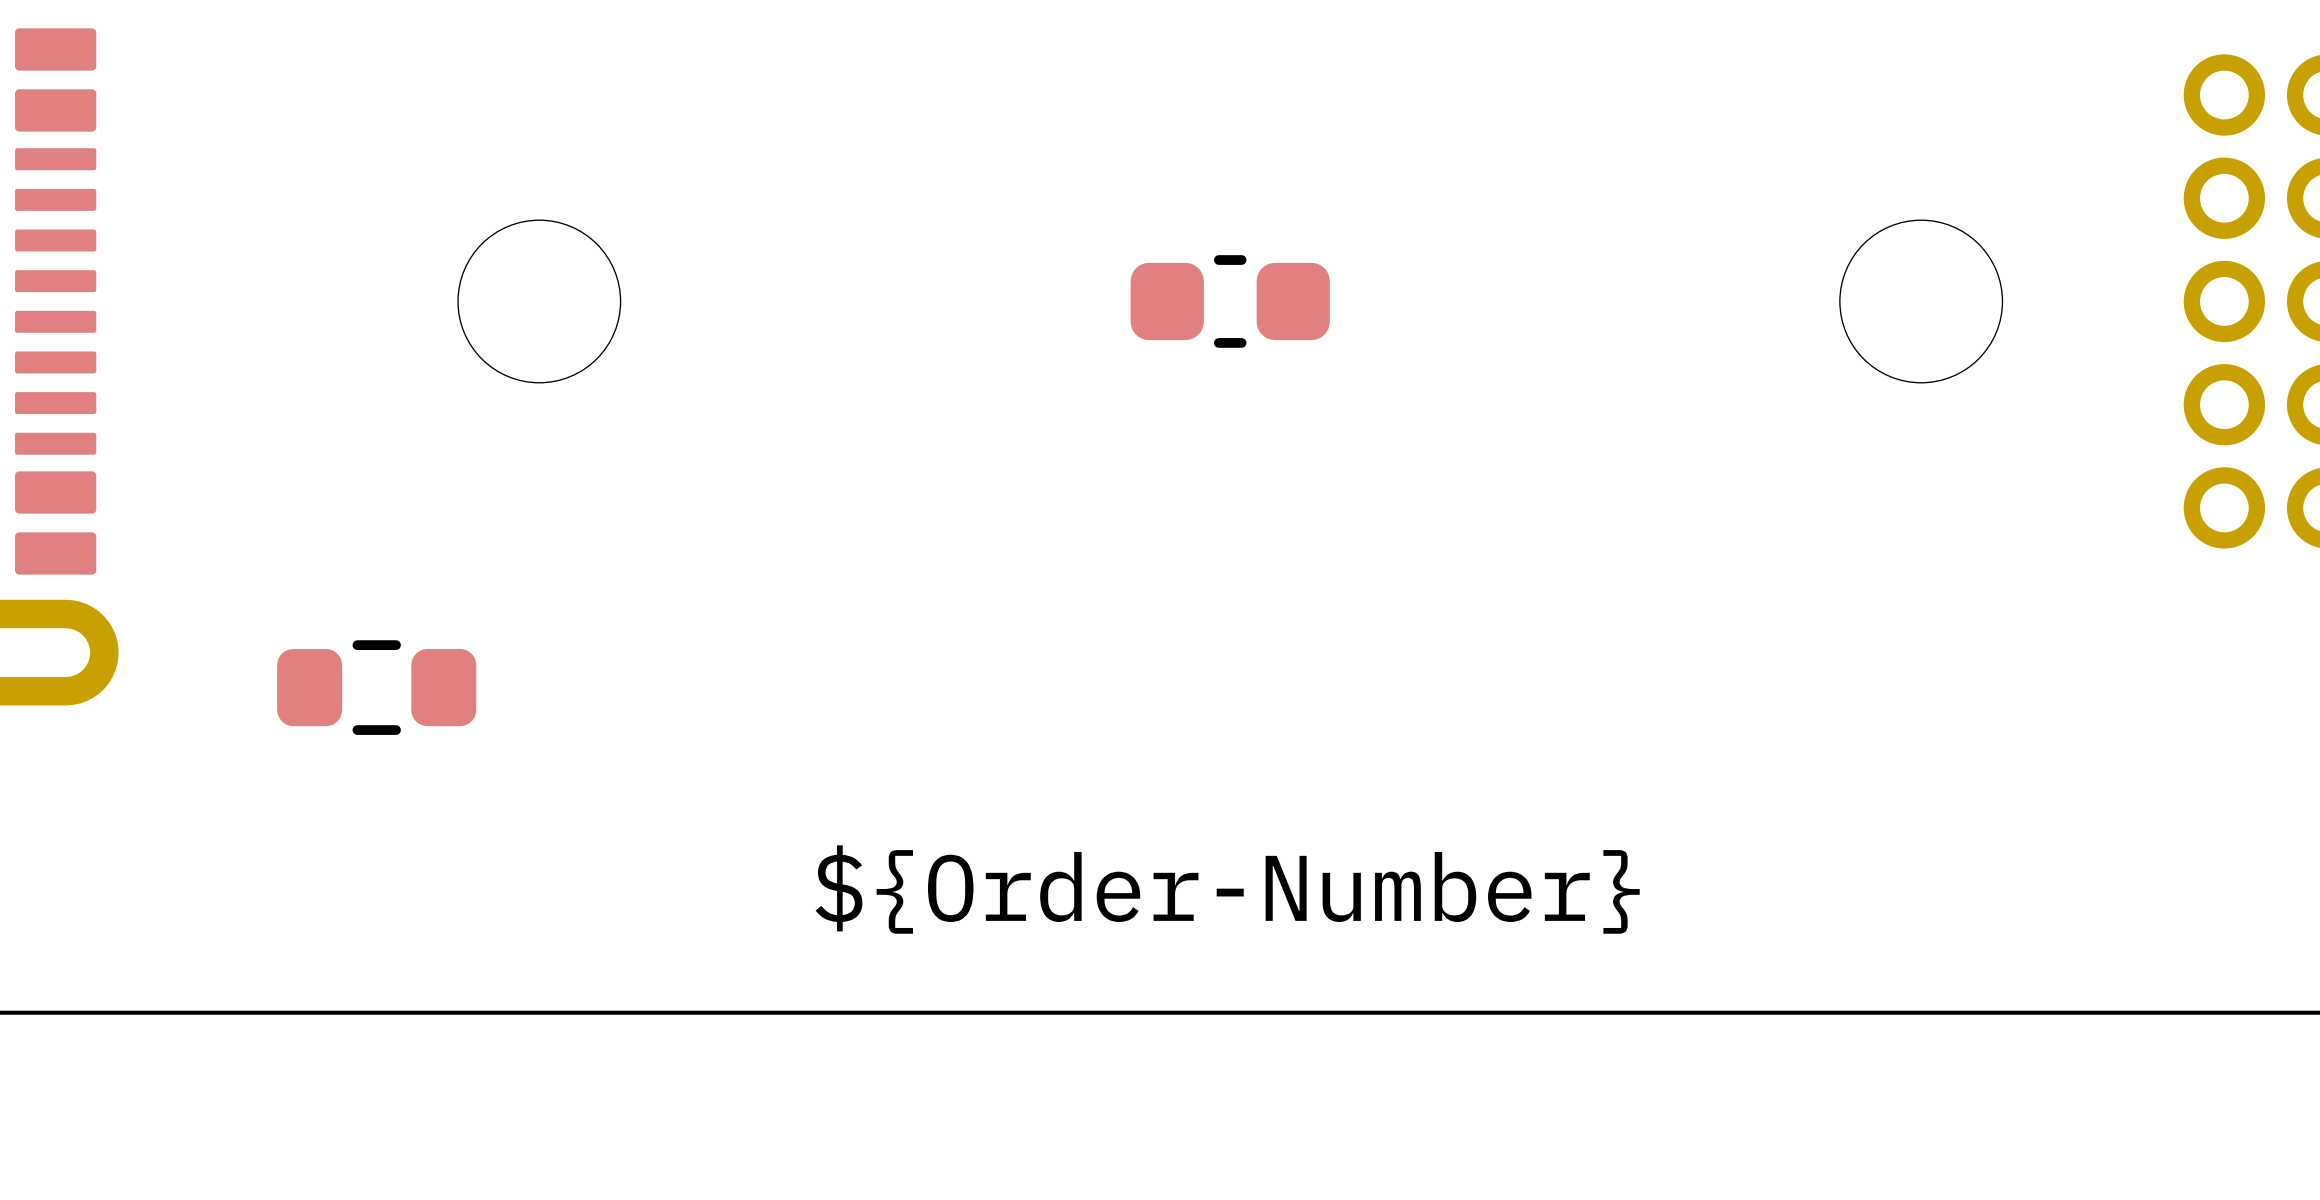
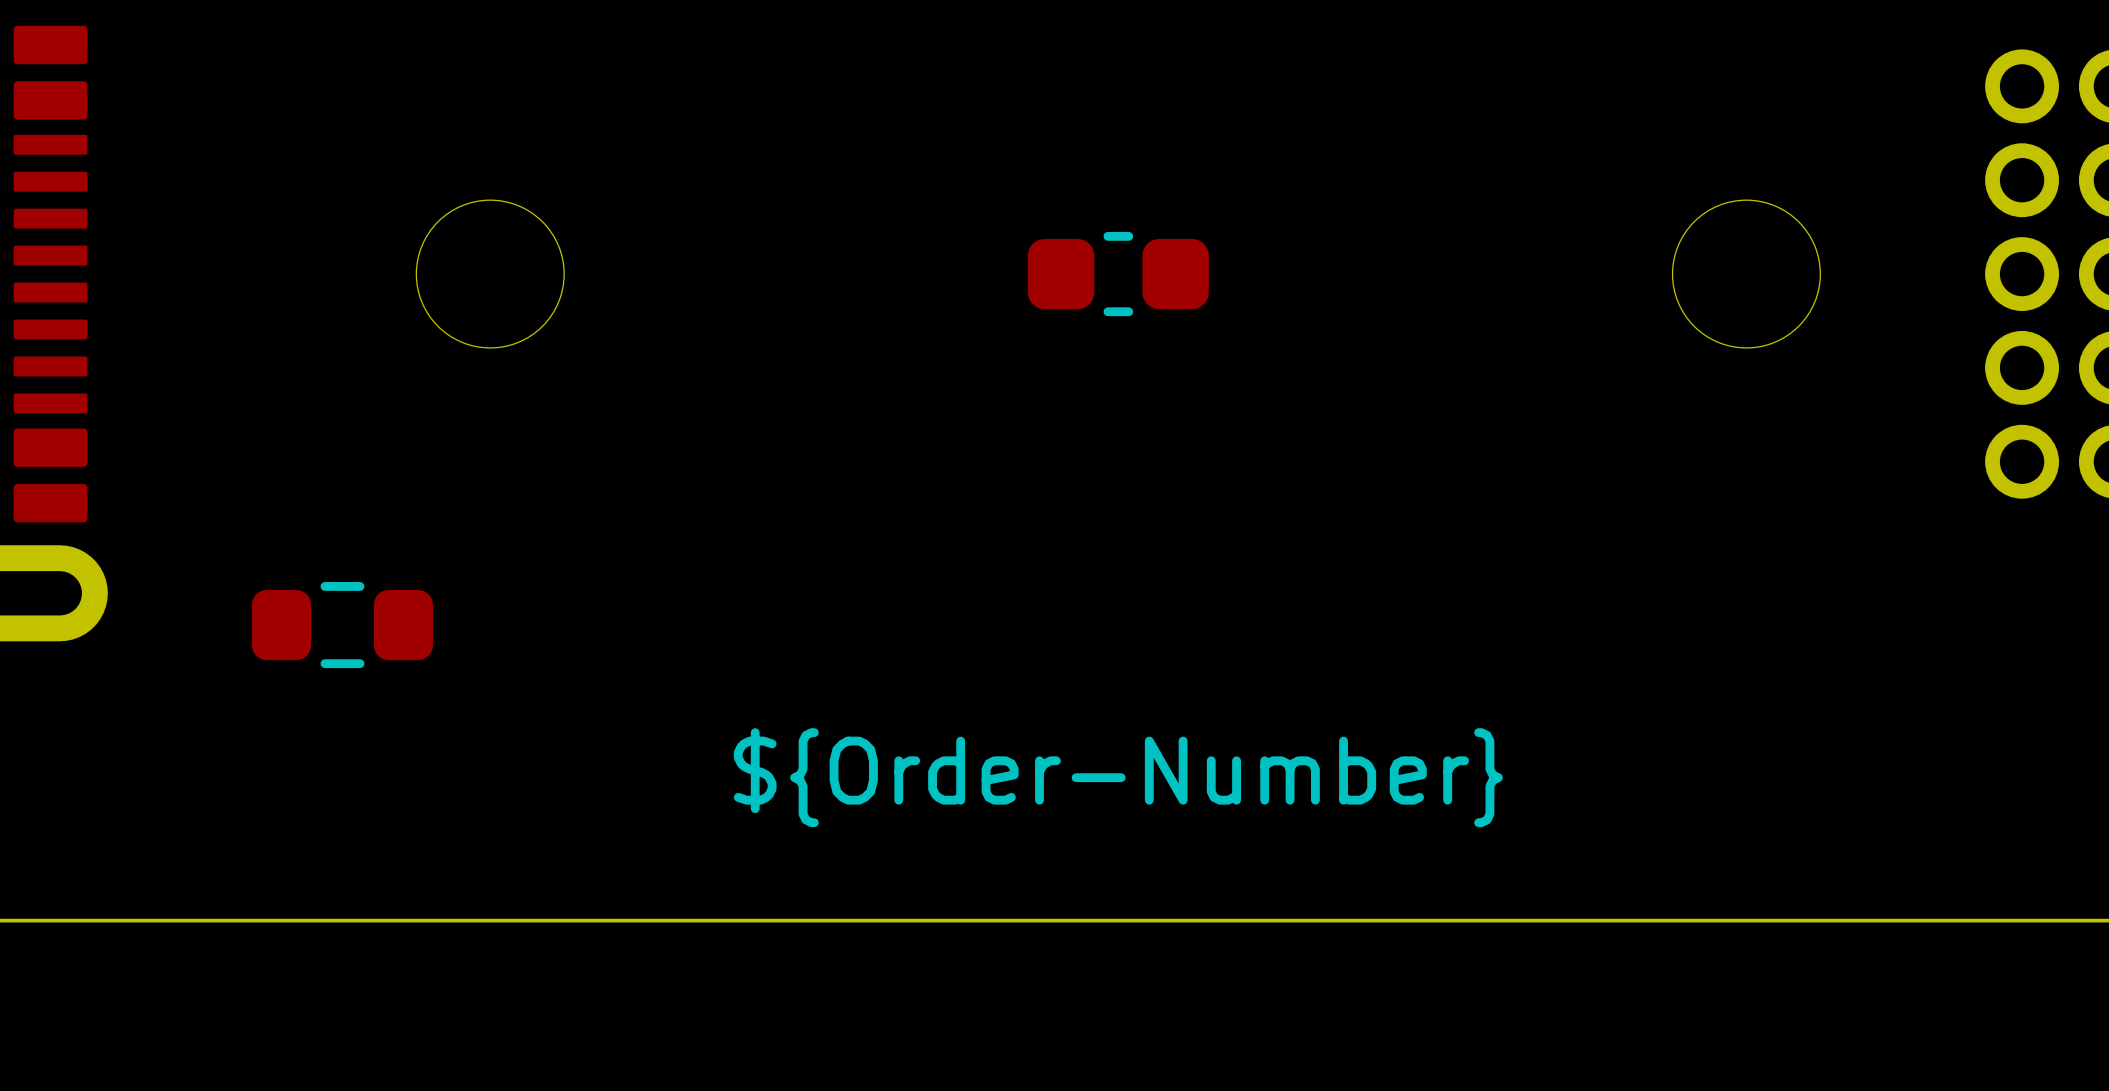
drawing position: (1227, 889) -> (1118, 777)

